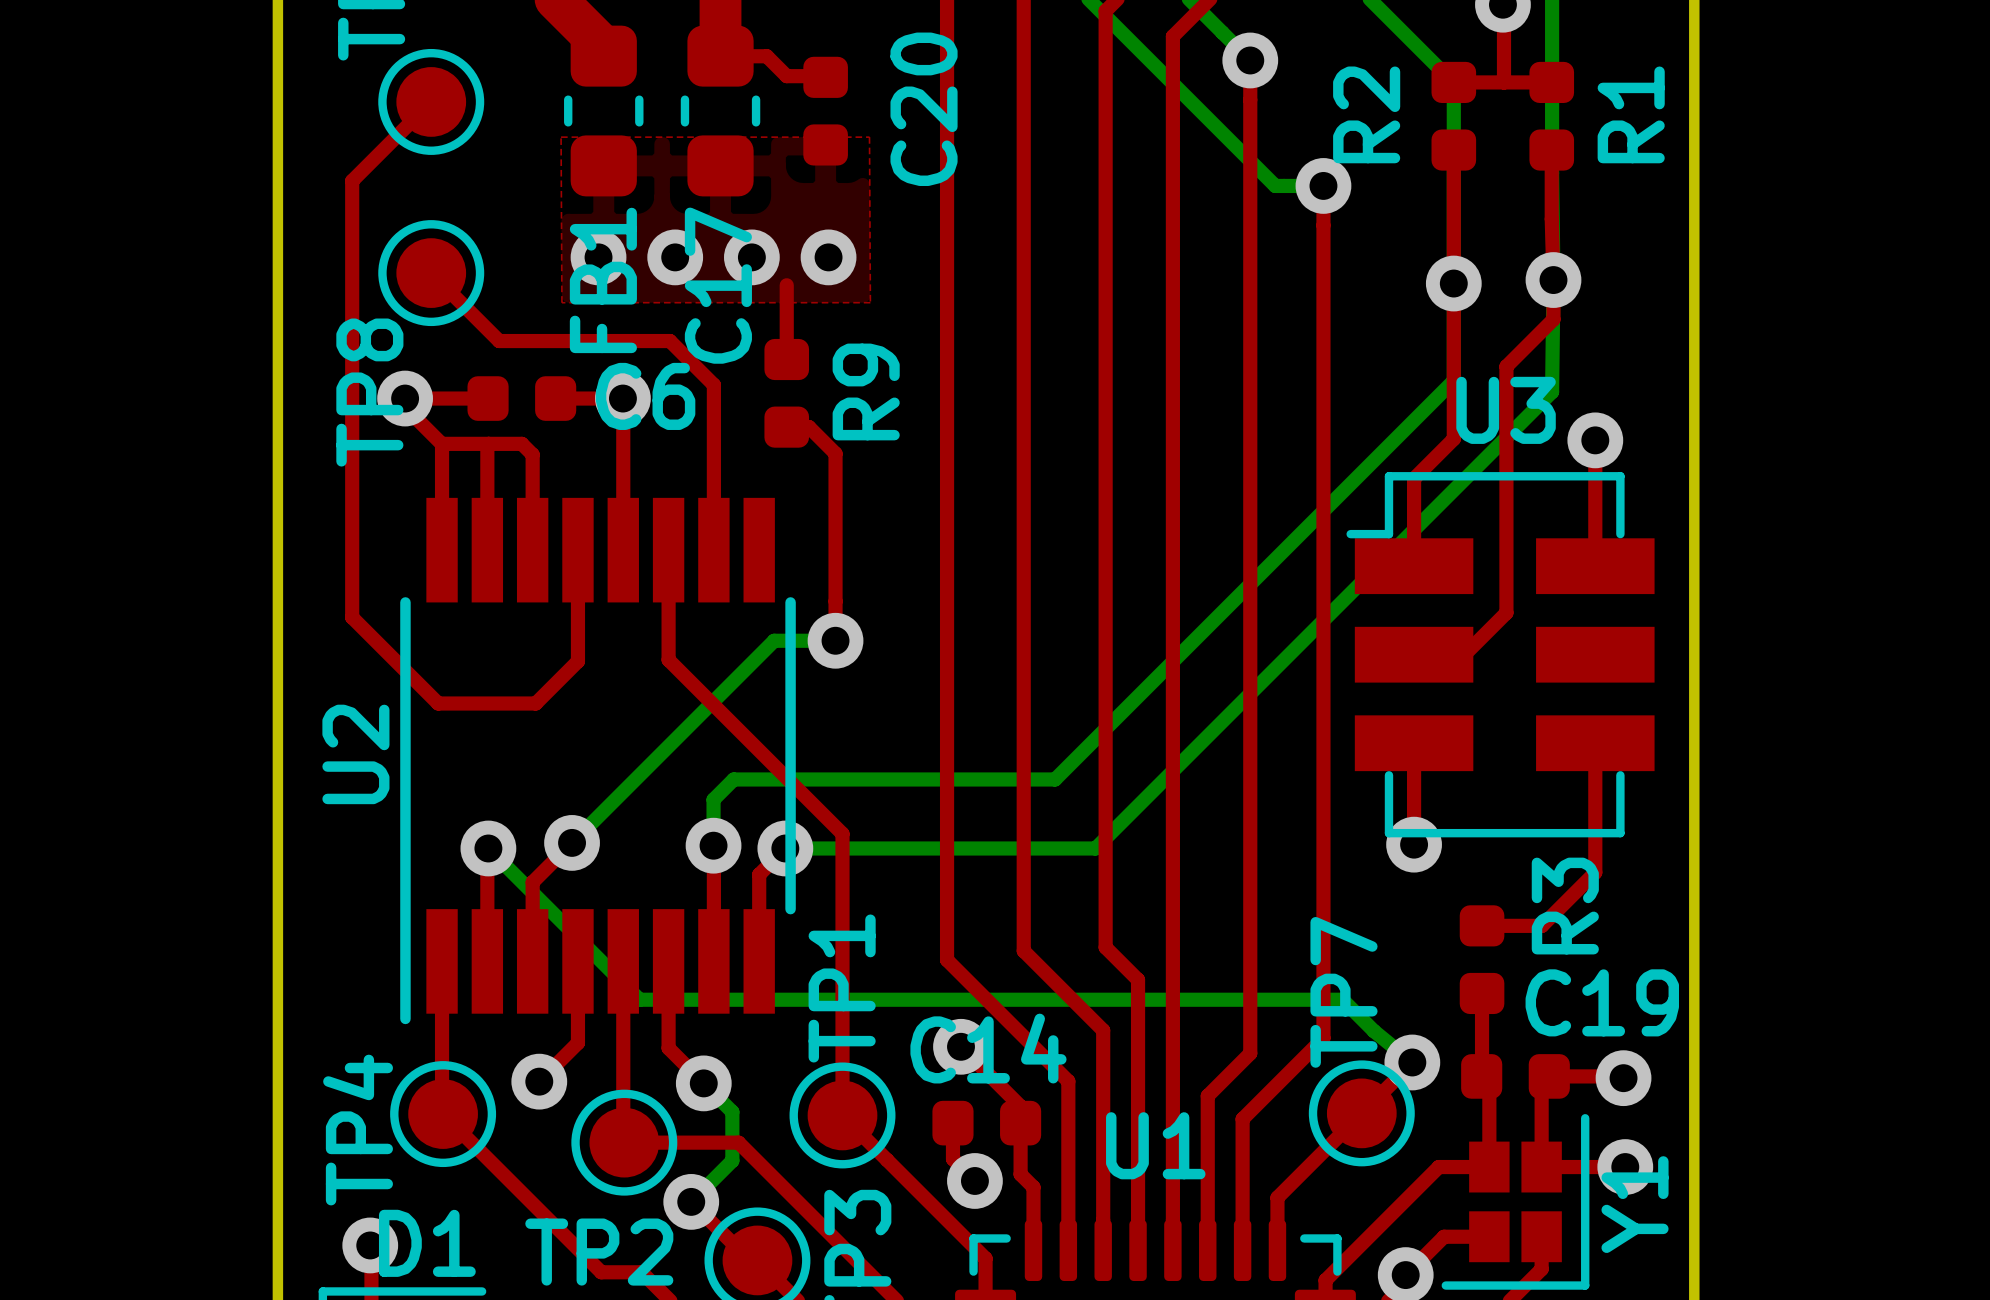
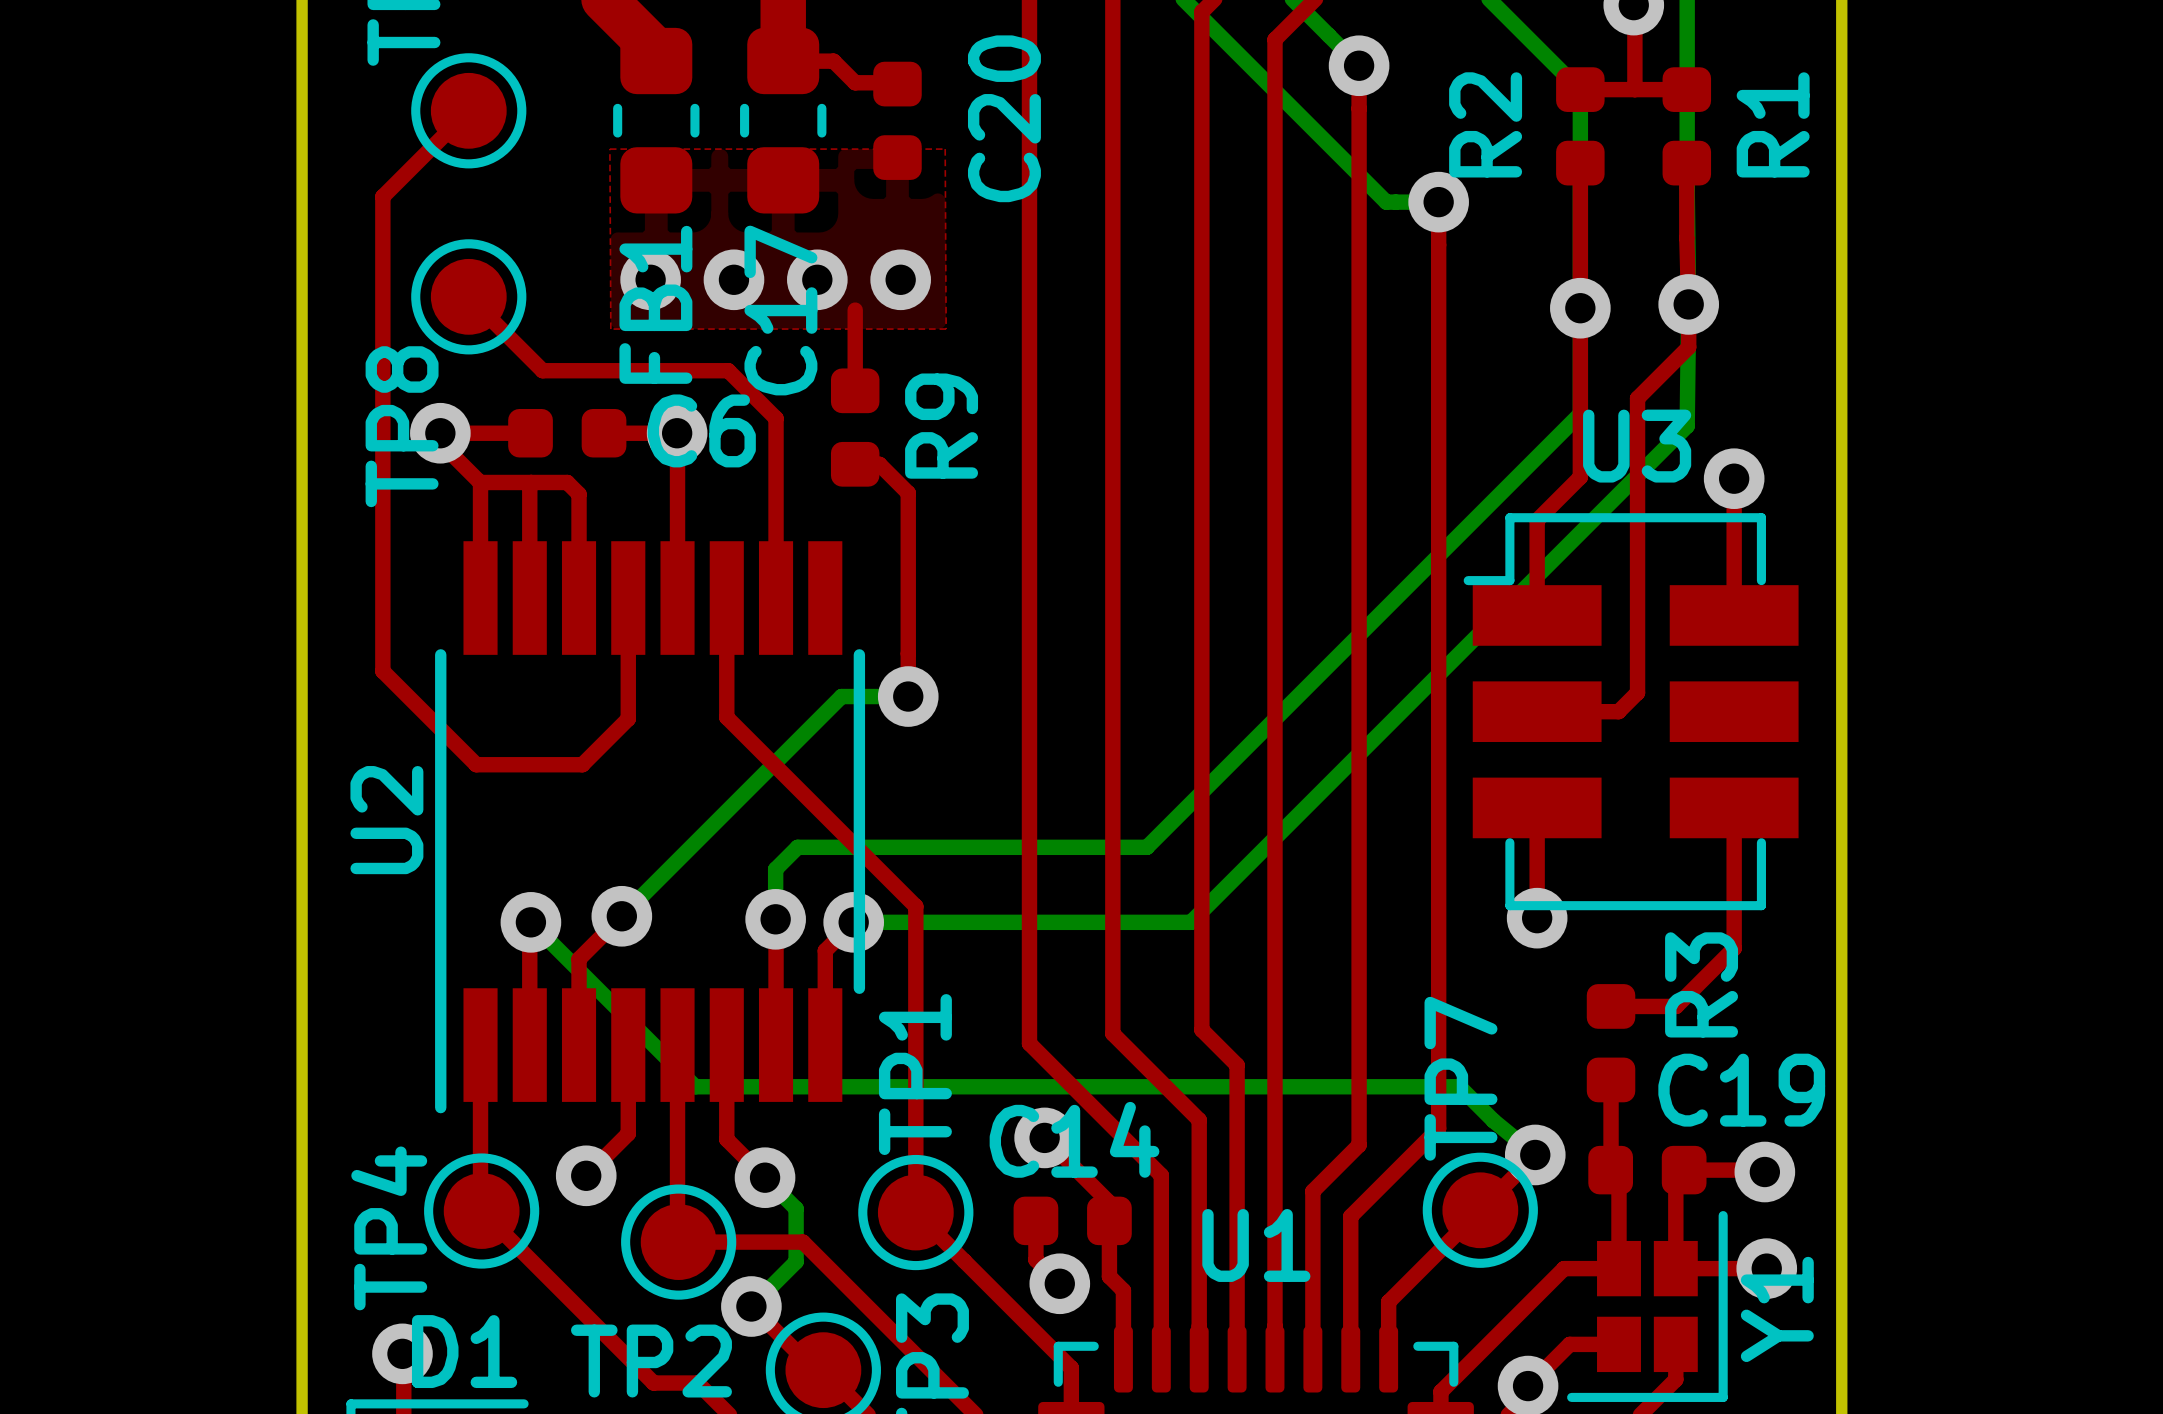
top track: (1506, 612) (1464, 654) -> (1637, 666) (1637, 692) (1618, 711) (1592, 711)

